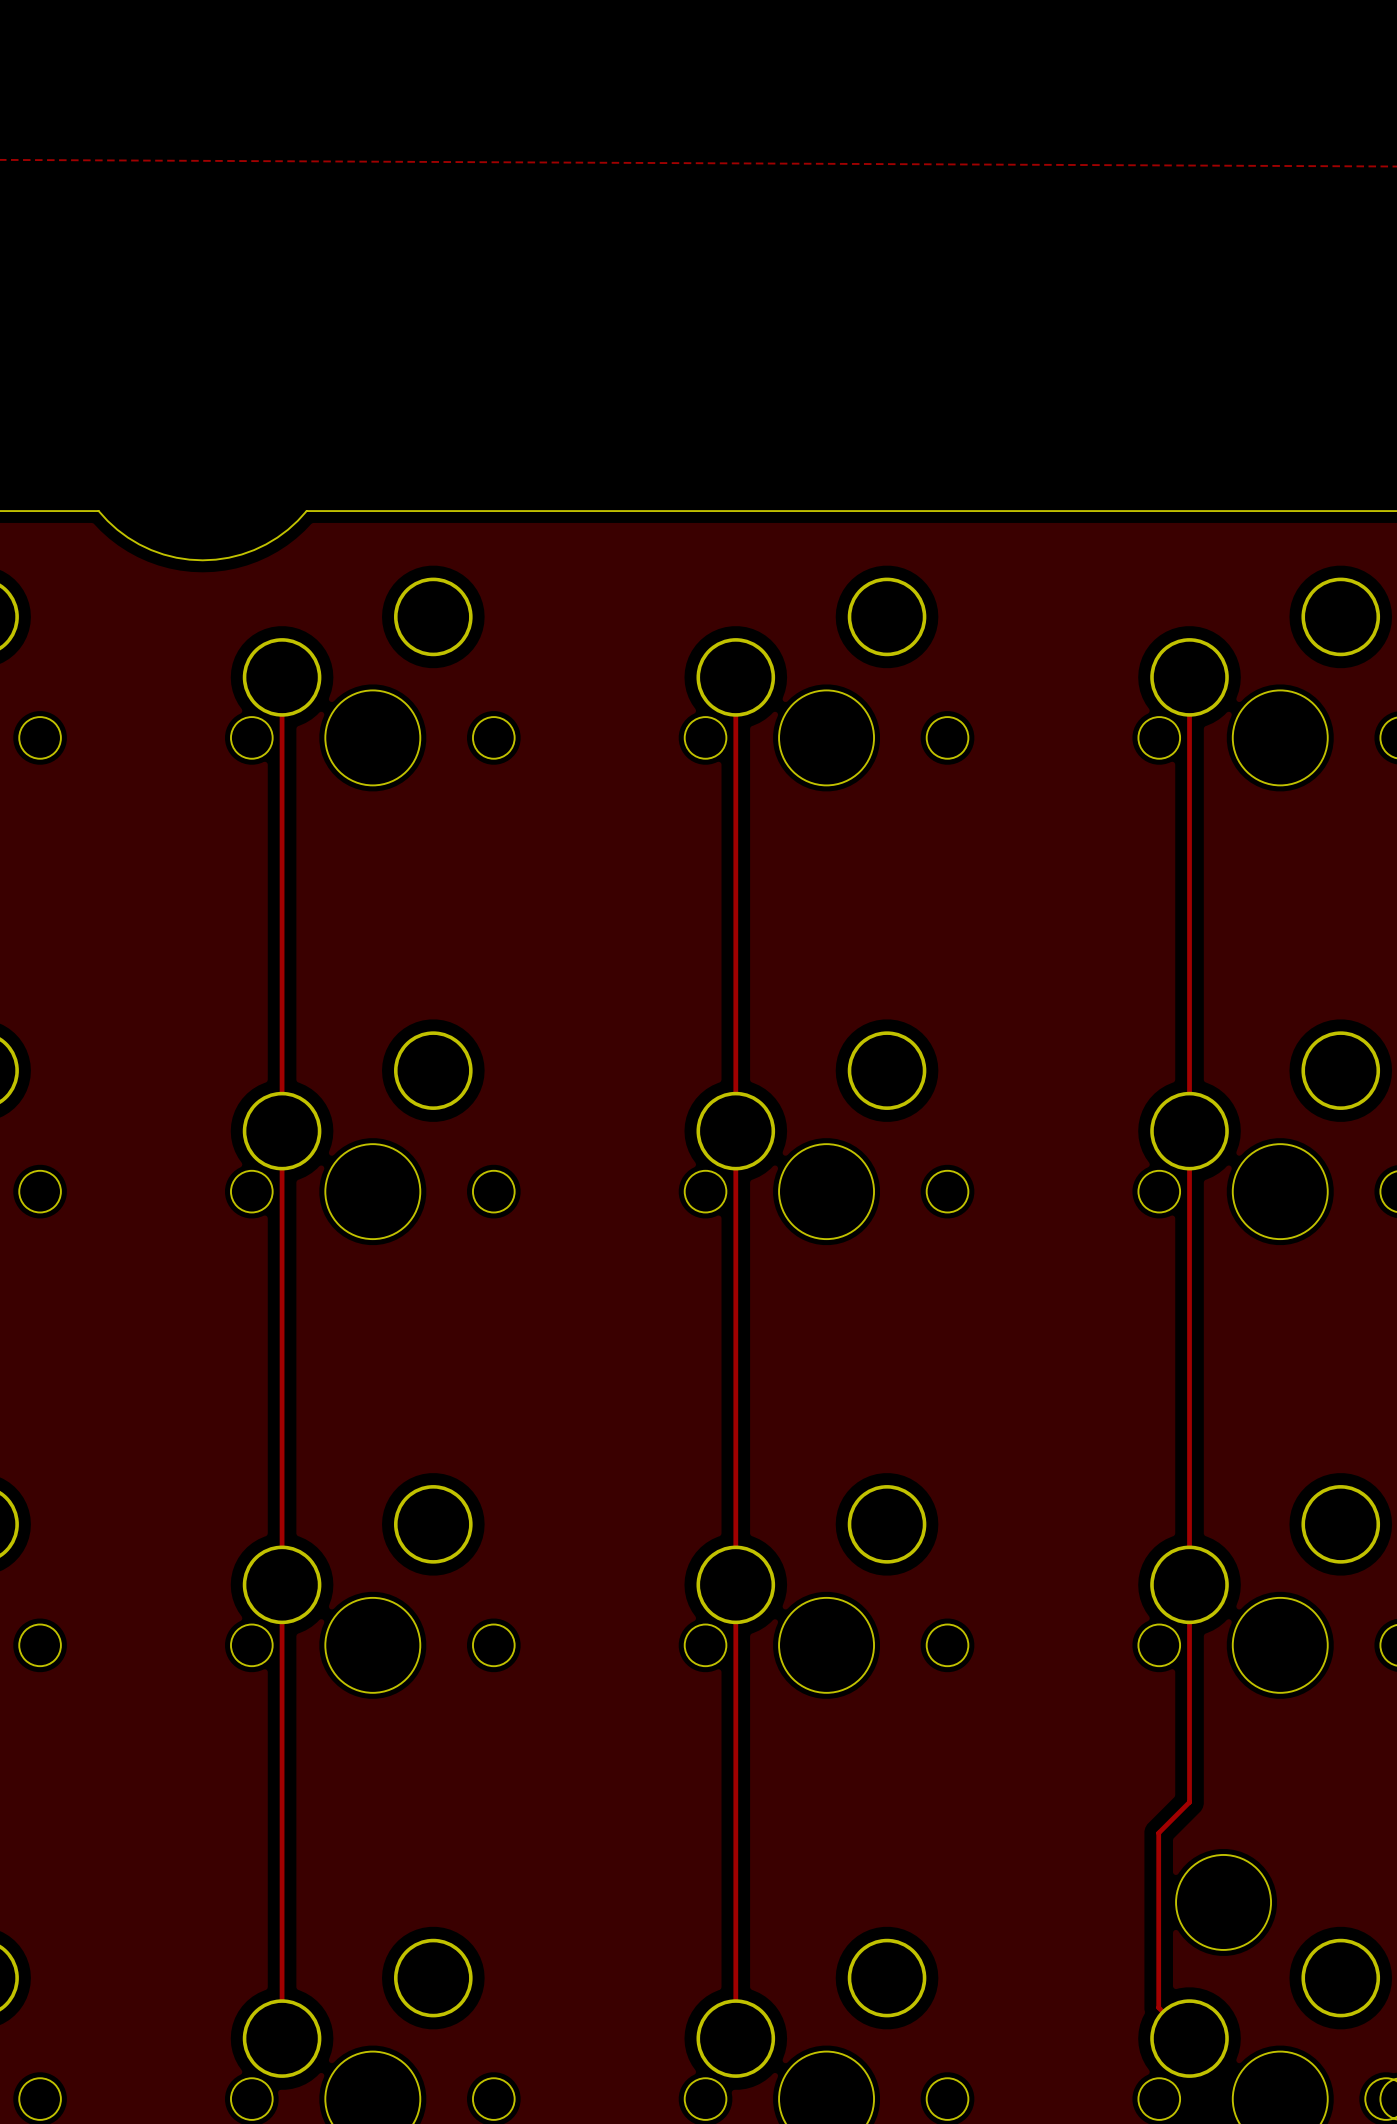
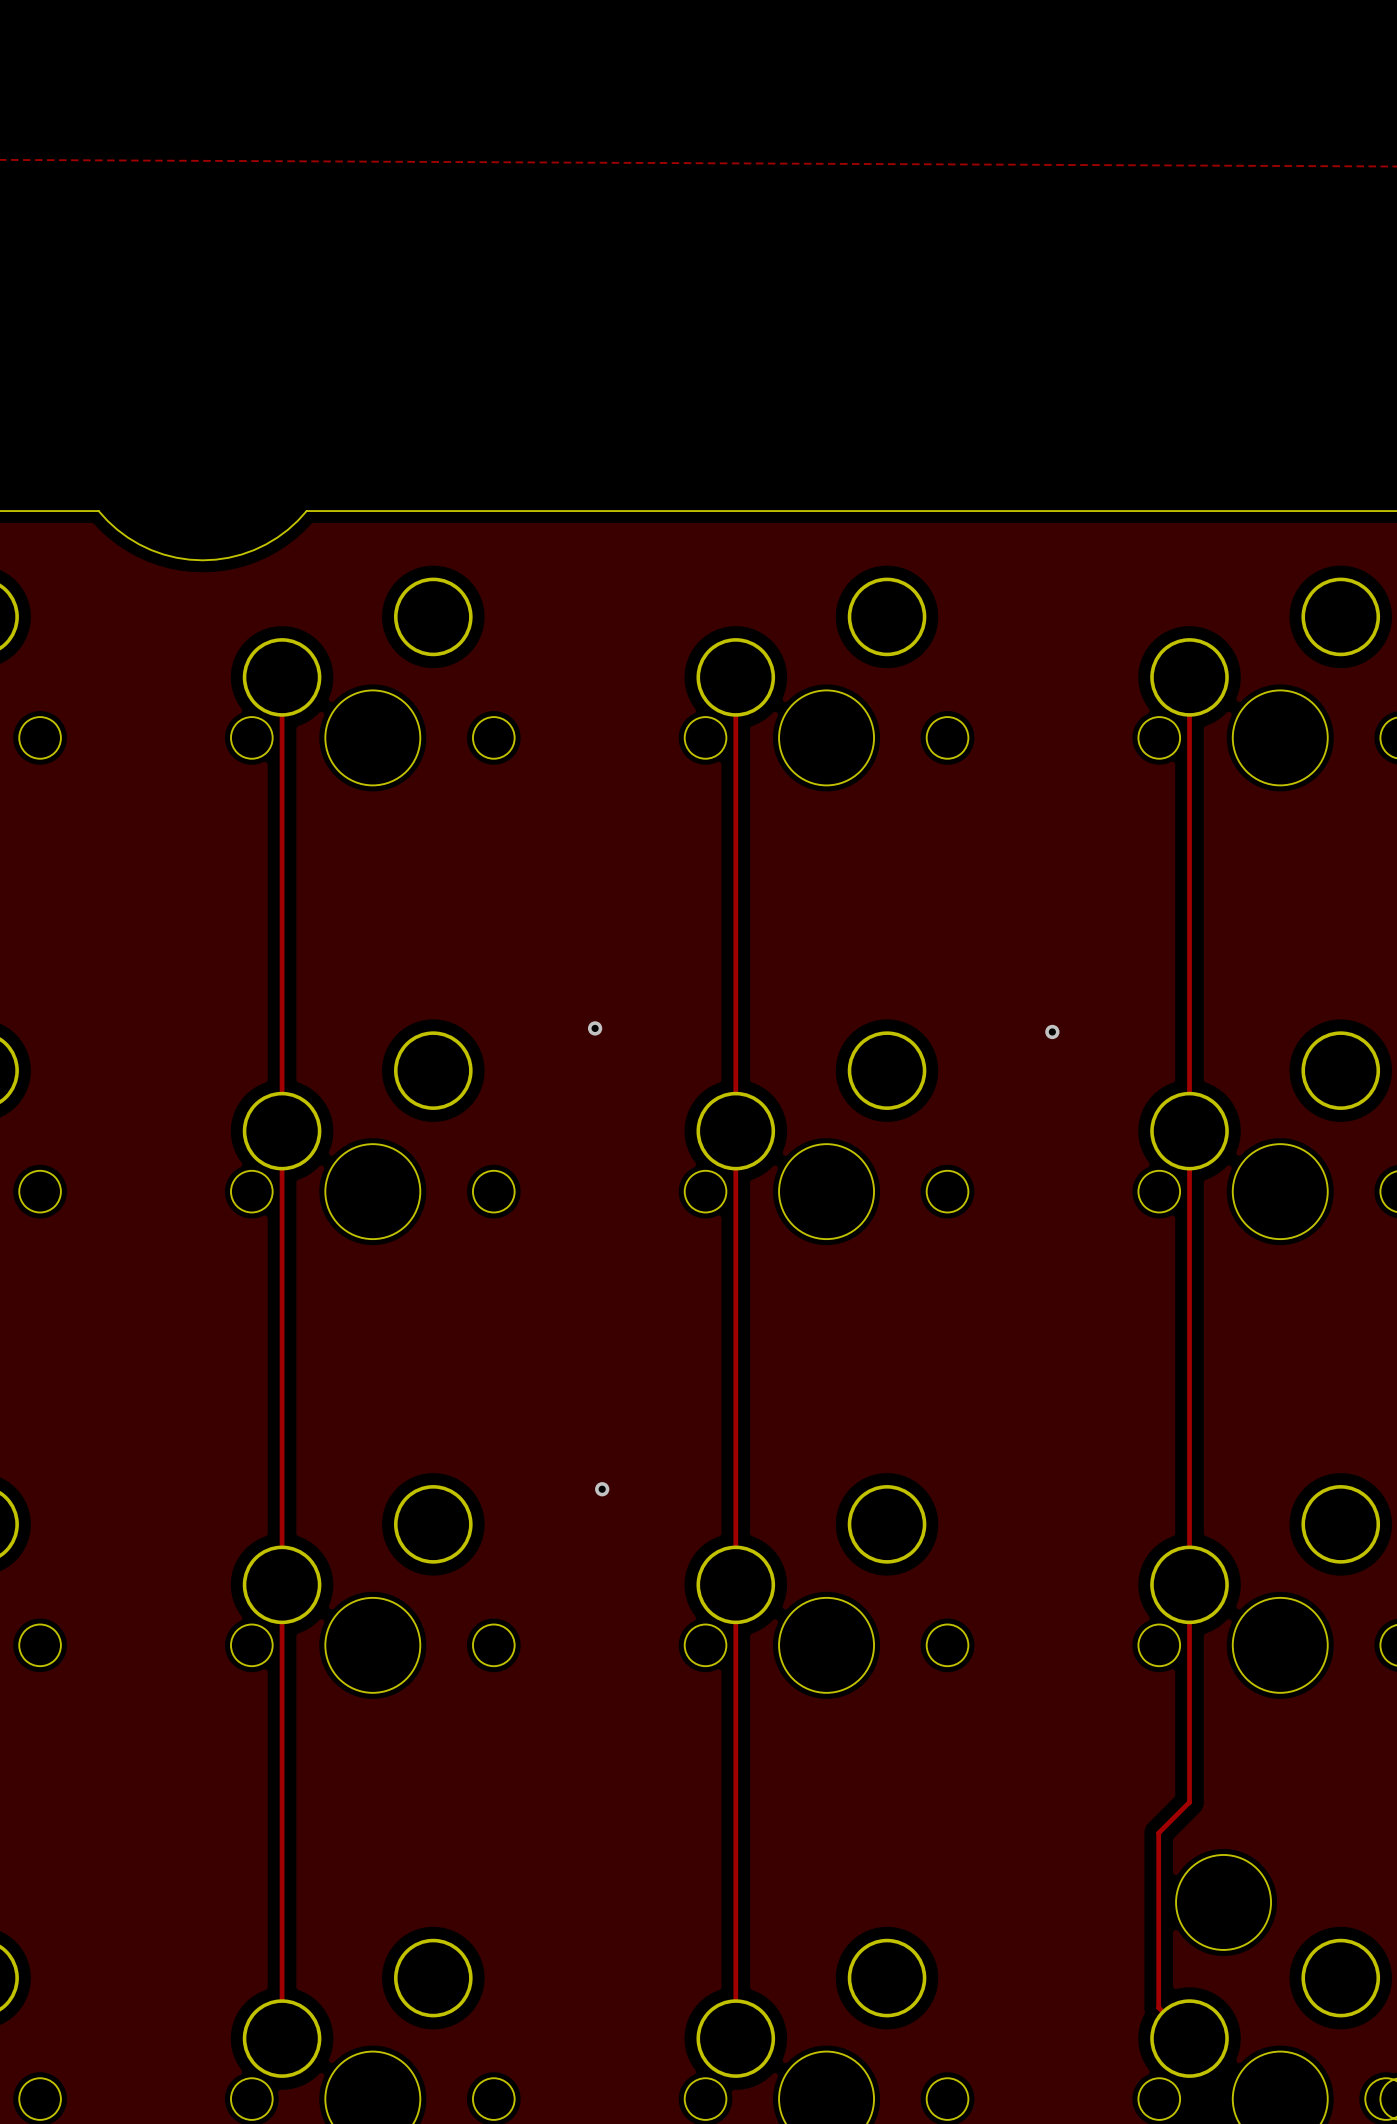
via: none -> (595, 1028)
via: none -> (1052, 1031)
via: none -> (602, 1489)

